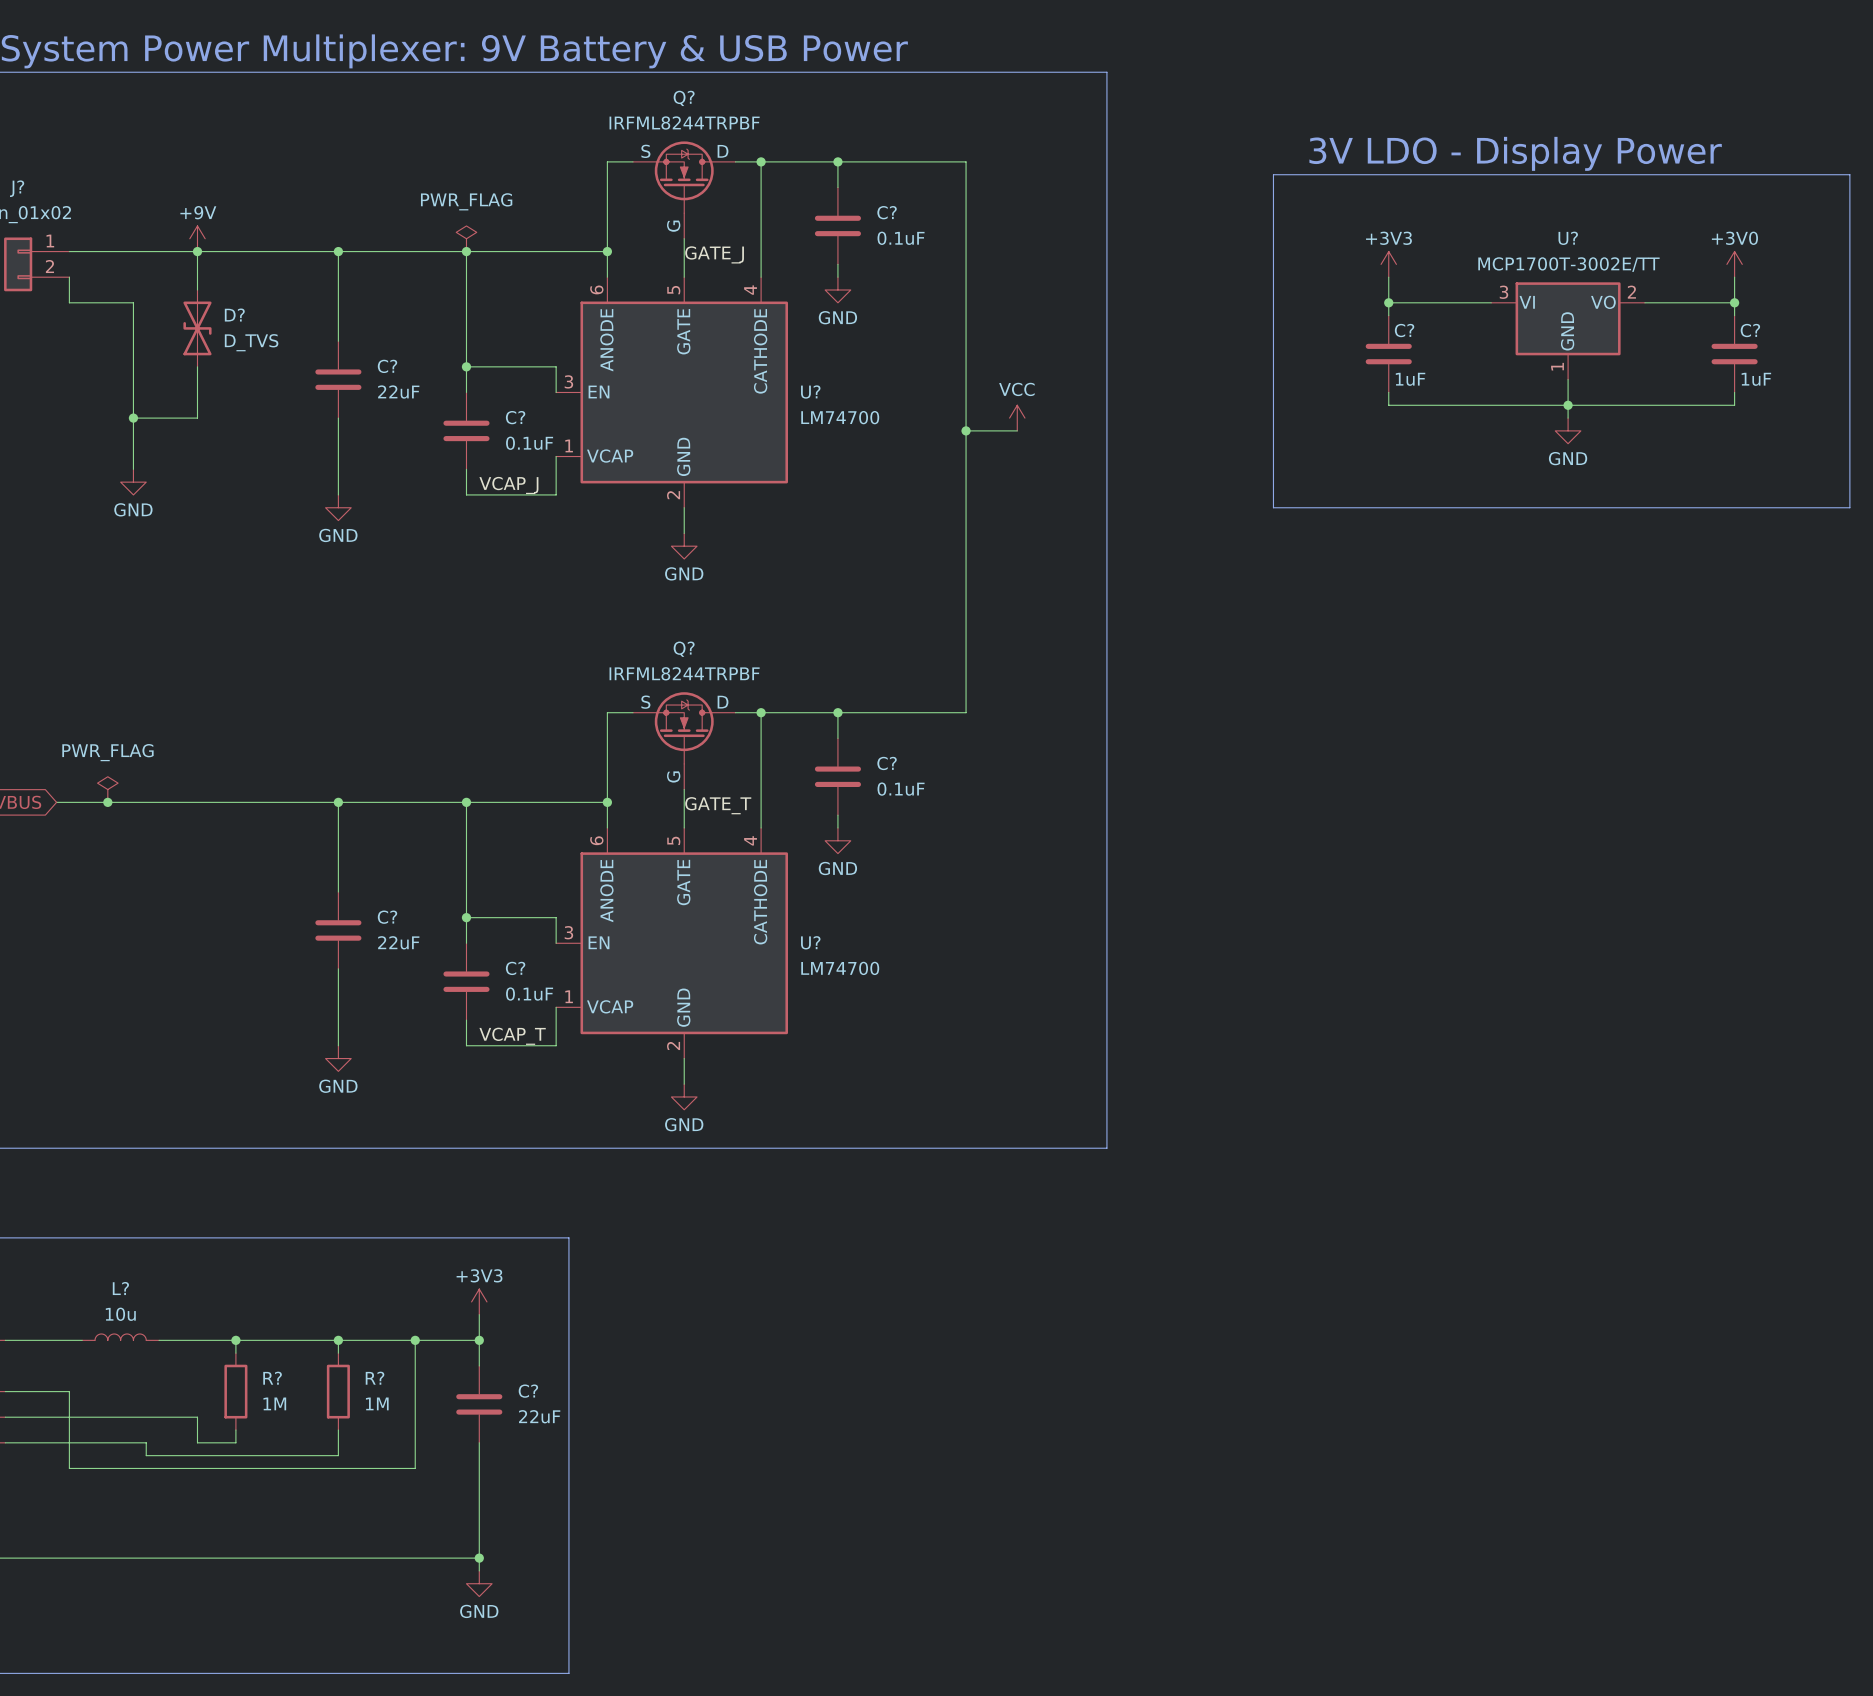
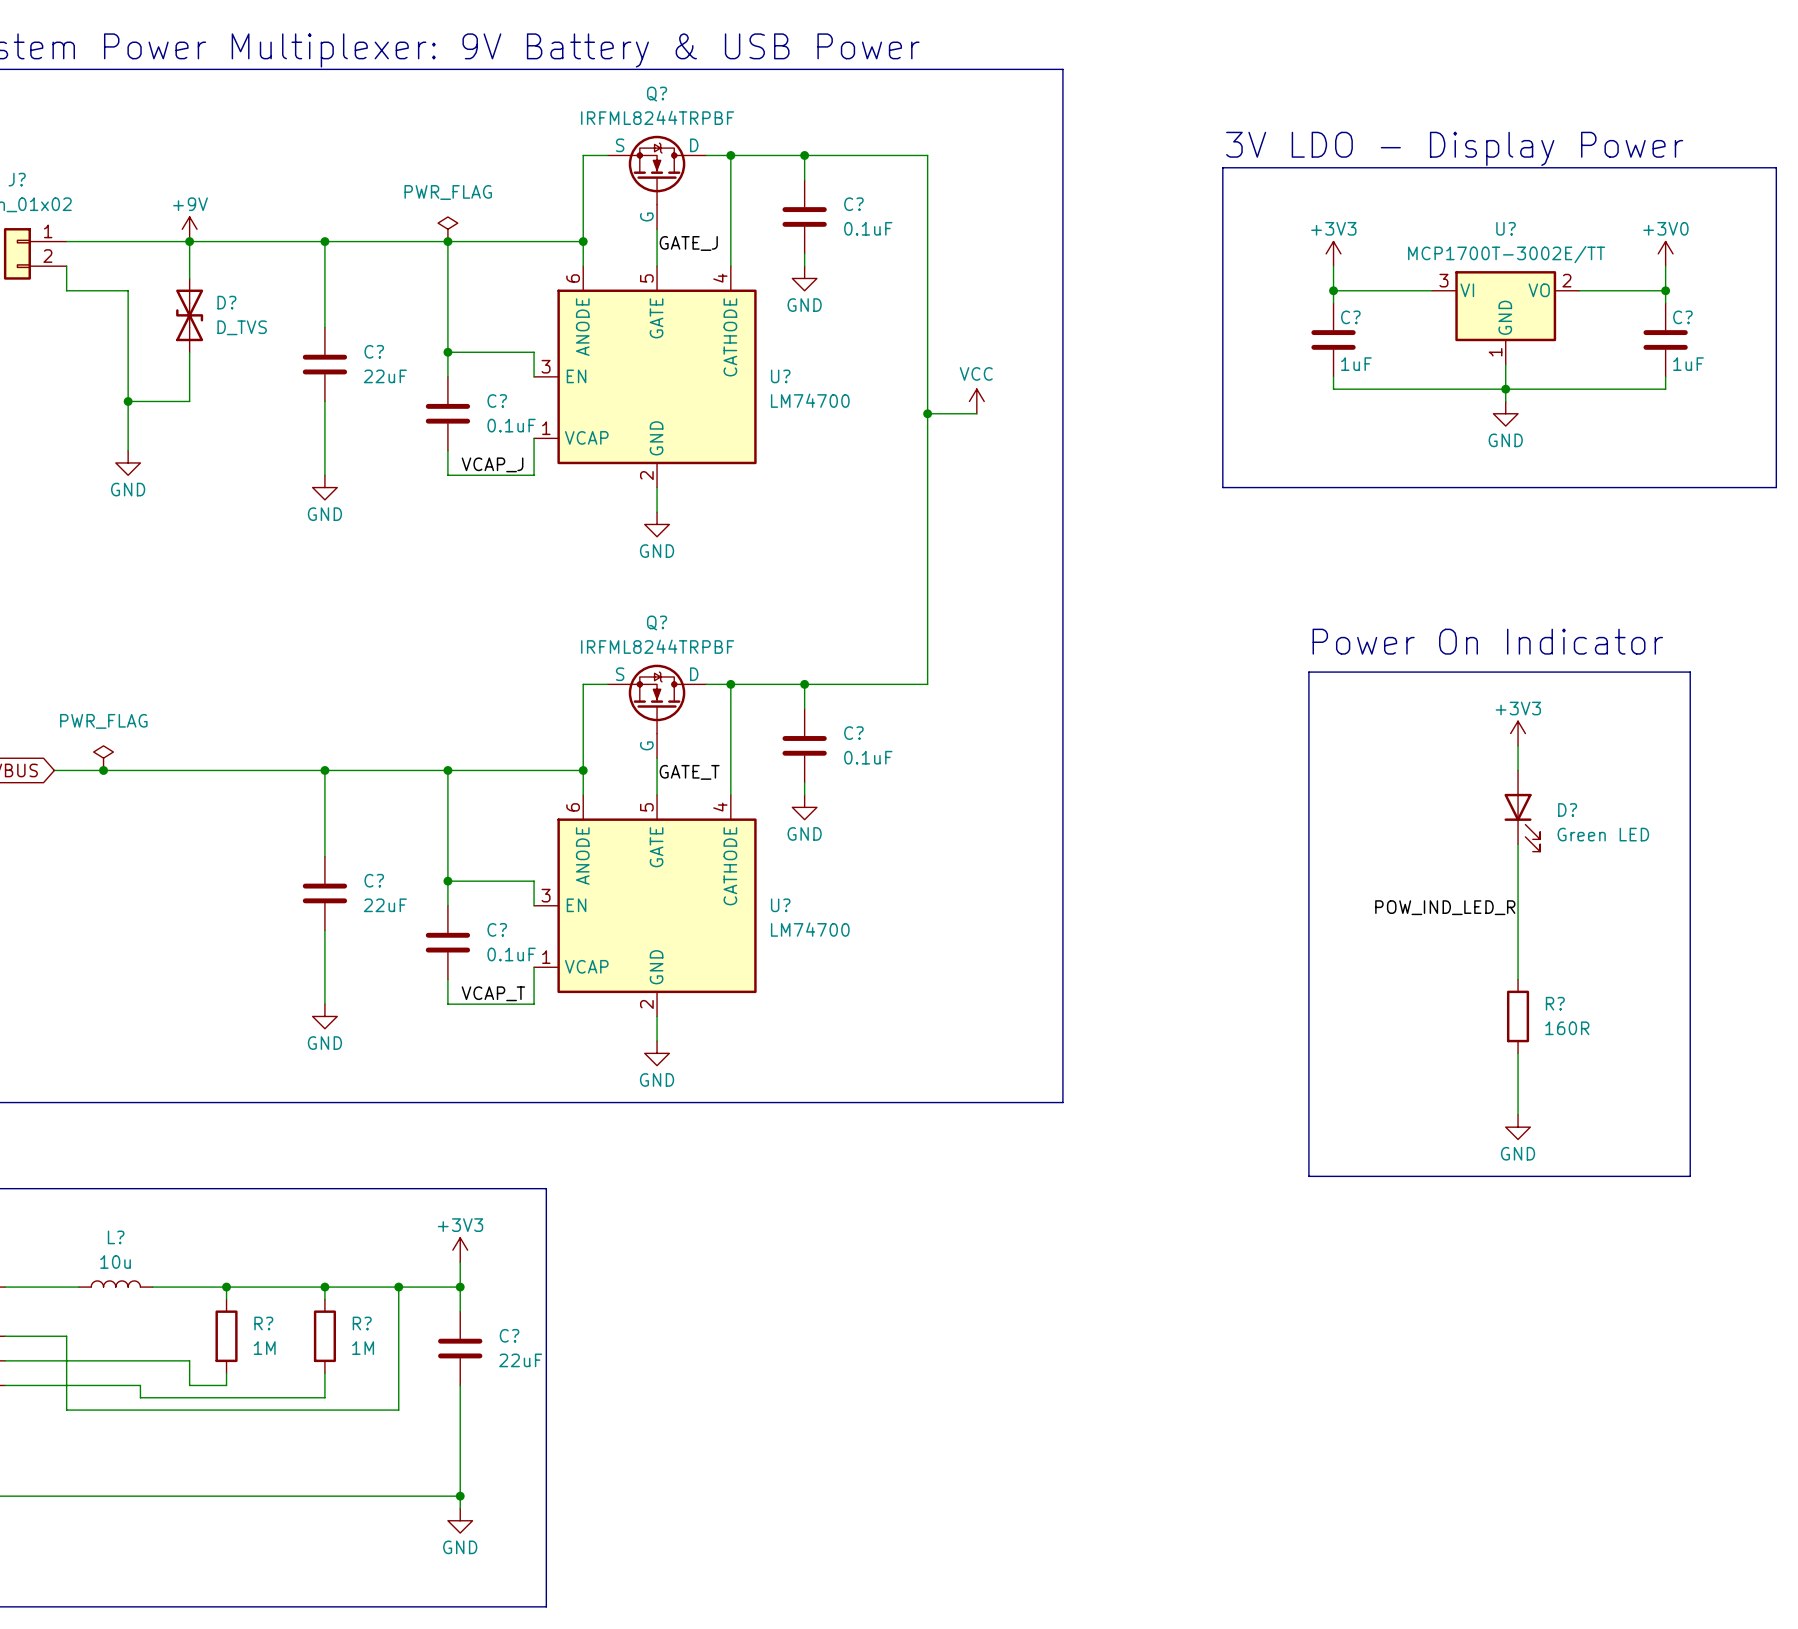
text: none -> Power On Indicator (1487, 641)
line: none -> (1308, 672) (1690, 672) (1690, 1176) (1308, 1176) (1308, 672)
power symbol: none -> +3V3 (1518, 733)
wire: none -> (1518, 745) (1518, 770)
D?: none -> Green LED (1522, 811)
wire: none -> (1518, 844) (1518, 979)
label: none -> POW_IND_LED_R (1445, 907)
R?: none -> 160R (1518, 1016)
wire: none -> (1518, 1053) (1518, 1114)
power symbol: none -> GND (1518, 1127)

